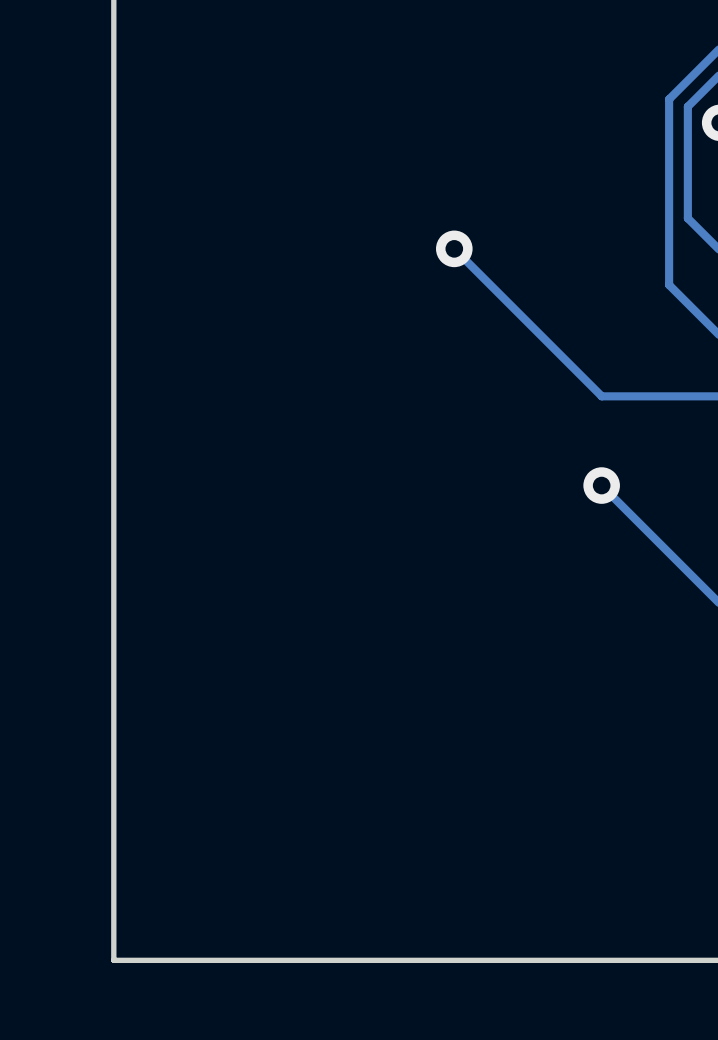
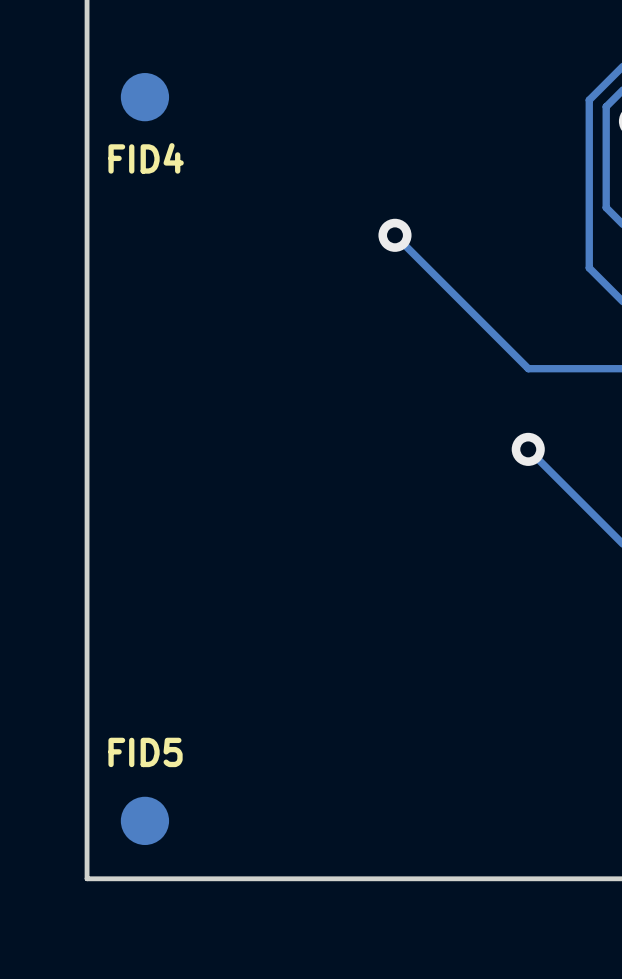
FID4: none -> (144, 97)
FID5: none -> (144, 820)

